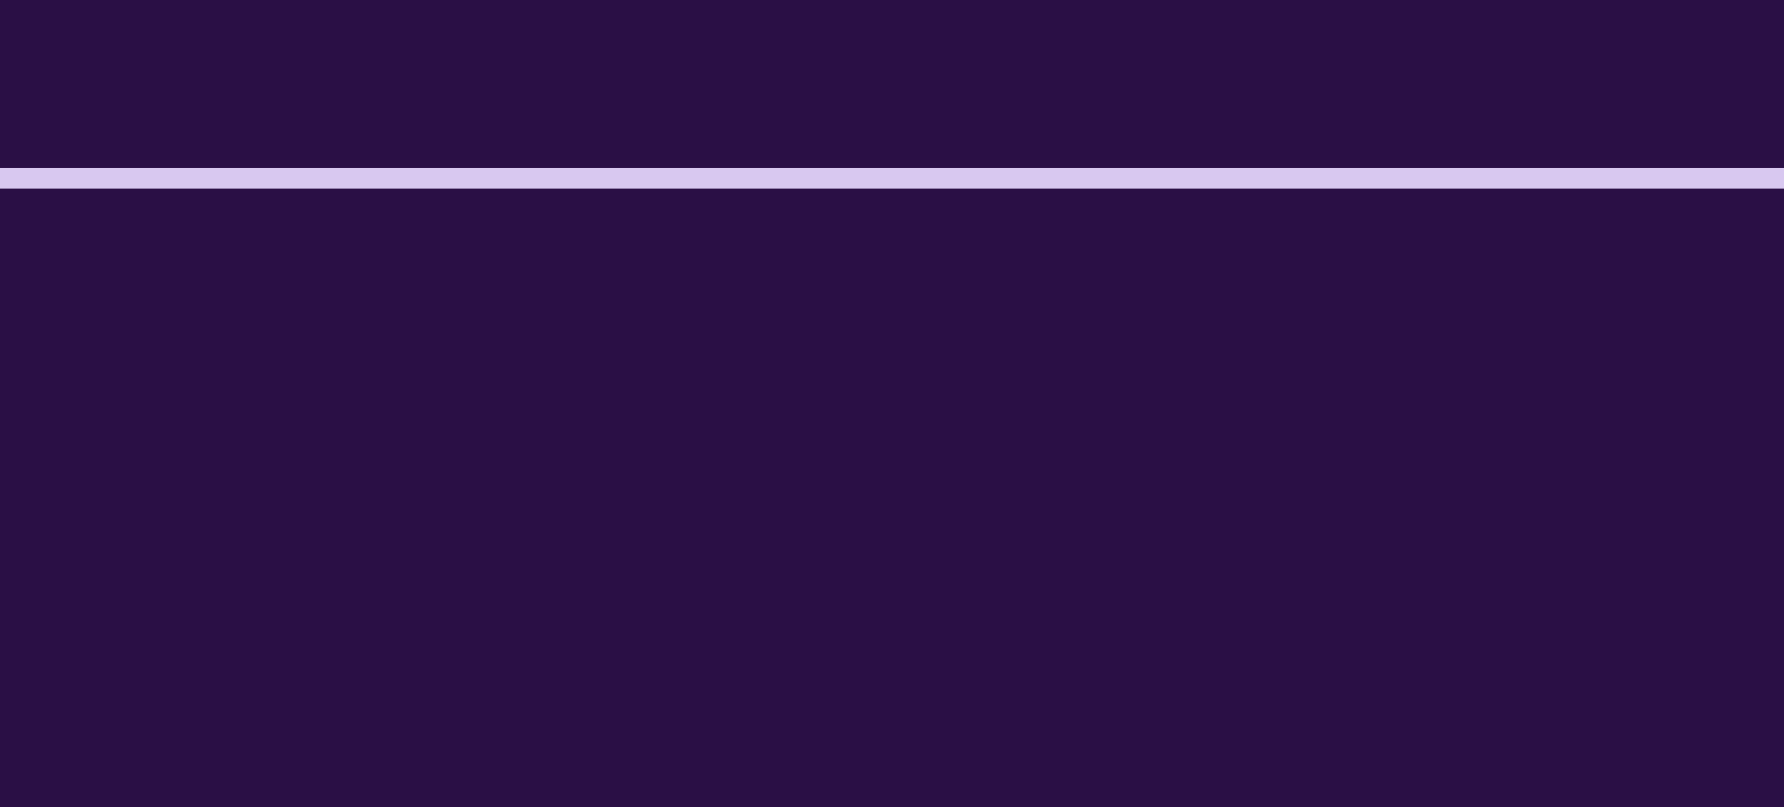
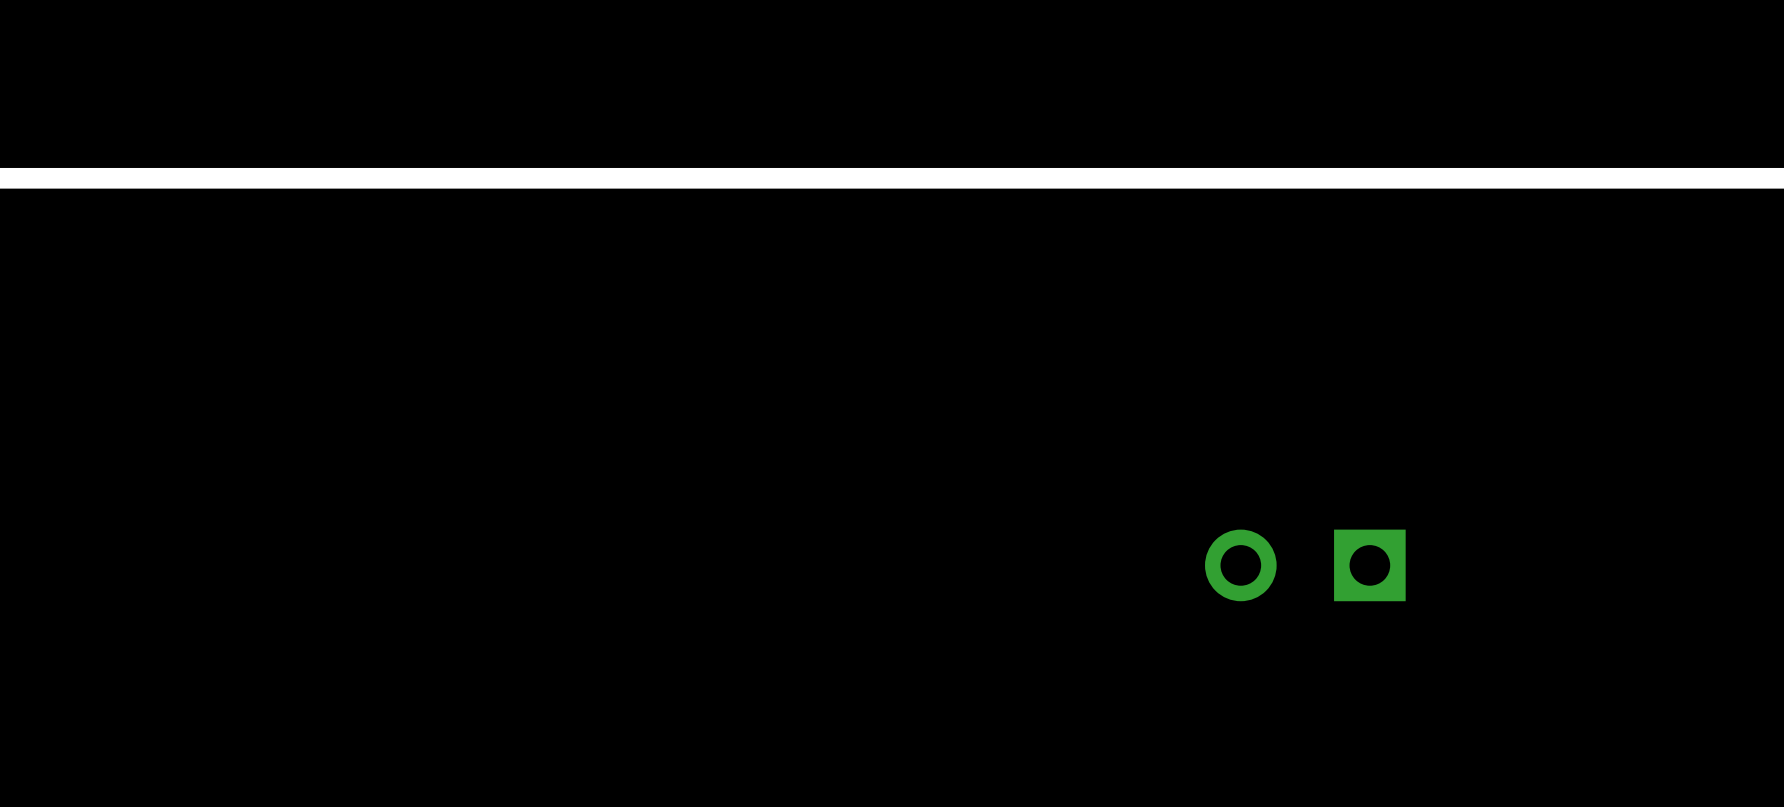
part: none -> (1305, 565)

